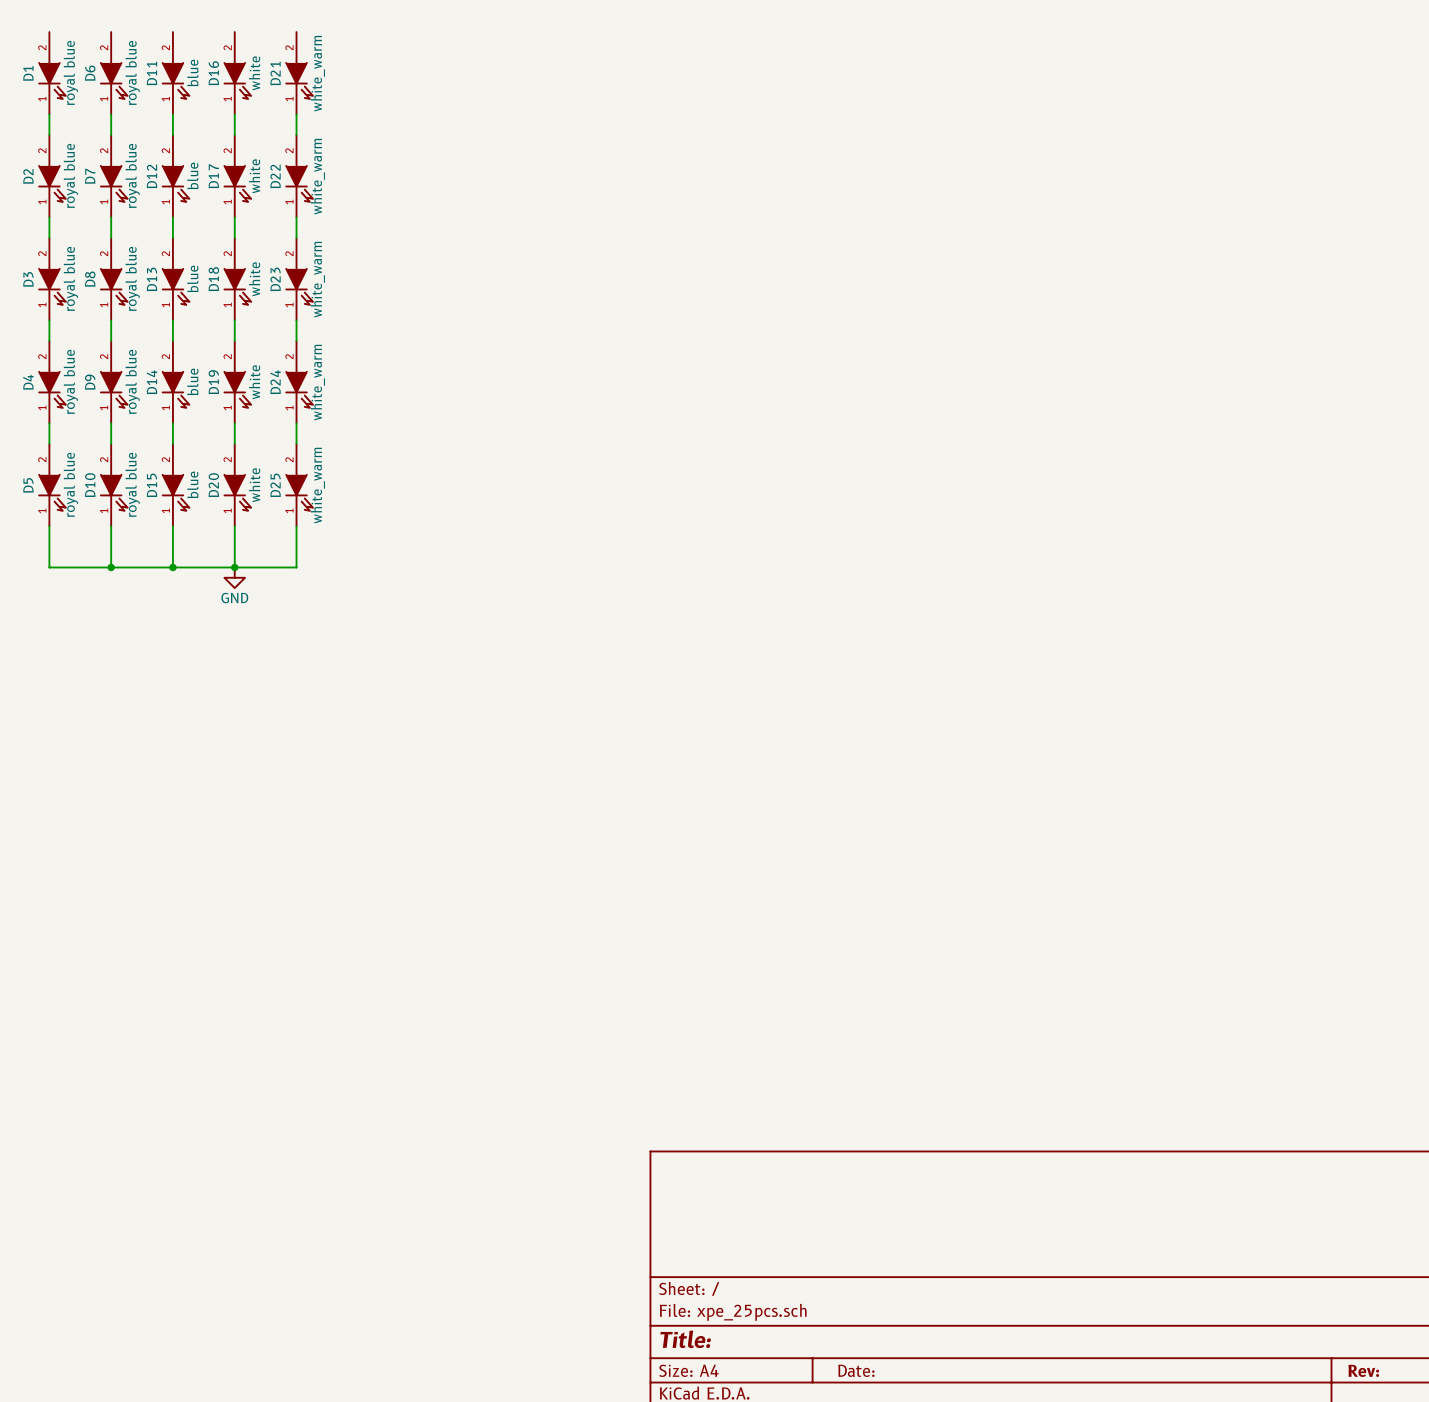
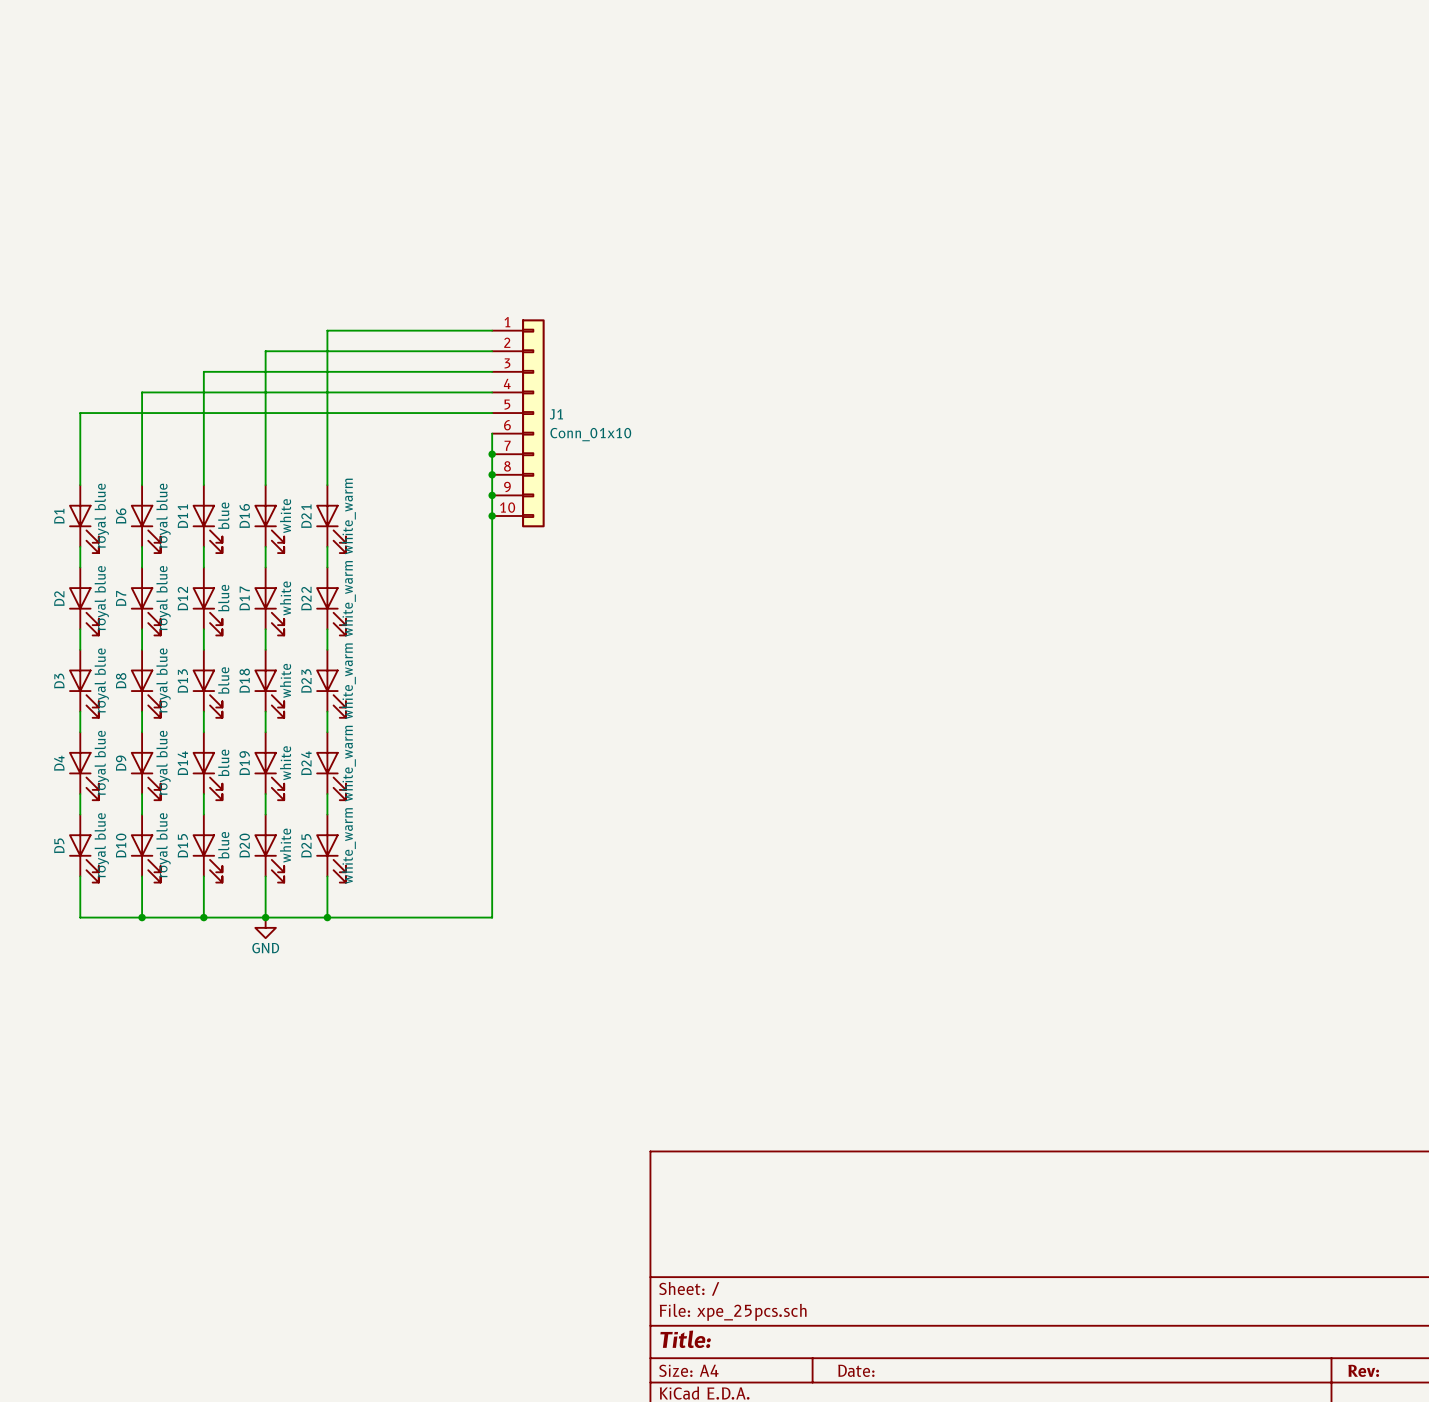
D1 symbol: [39, 32, 66, 115] -> [69, 485, 99, 554]
D6 symbol: [100, 32, 128, 115] -> [130, 485, 161, 554]
D11 symbol: [162, 32, 190, 115] -> [192, 485, 223, 554]
D16 symbol: [224, 32, 252, 115] -> [254, 485, 285, 554]
D21 symbol: [286, 32, 313, 115] -> [316, 485, 346, 554]
wire: (49, 114) (49, 135) -> none
wire: (111, 114) (111, 135) -> none
wire: (172, 114) (172, 135) -> none
wire: (234, 114) (234, 135) -> none
wire: (296, 114) (296, 135) -> none
D2 symbol: [39, 135, 66, 218] -> [69, 567, 99, 636]
D7 symbol: [100, 135, 128, 218] -> [130, 567, 161, 636]
D12 symbol: [162, 135, 190, 218] -> [192, 567, 223, 636]
D17 symbol: [224, 135, 252, 218] -> [254, 567, 285, 636]
D22 symbol: [286, 135, 313, 218] -> [316, 567, 346, 636]
wire: (49, 217) (49, 237) -> none
wire: (111, 217) (111, 237) -> none
wire: (172, 217) (172, 237) -> none
wire: (234, 217) (234, 237) -> none
wire: (296, 217) (296, 237) -> none
D3 symbol: [39, 237, 66, 321] -> [69, 649, 99, 718]
D8 symbol: [100, 237, 128, 321] -> [130, 649, 161, 718]
D13 symbol: [162, 237, 190, 321] -> [192, 649, 223, 718]
D18 symbol: [224, 237, 252, 321] -> [254, 649, 285, 718]
D23 symbol: [286, 237, 313, 321] -> [316, 649, 346, 718]
wire: (49, 320) (49, 340) -> none
wire: (111, 320) (111, 340) -> none
wire: (172, 320) (172, 340) -> none
wire: (234, 320) (234, 340) -> none
wire: (296, 320) (296, 340) -> none
wire: none -> (492, 330) (327, 330) (327, 485)
D4 symbol: [39, 340, 66, 424] -> [69, 732, 99, 801]
D9 symbol: [100, 340, 128, 424] -> [130, 732, 161, 801]
D14 symbol: [162, 340, 190, 424] -> [192, 732, 223, 801]
D19 symbol: [224, 340, 252, 424] -> [254, 732, 285, 801]
D24 symbol: [286, 340, 313, 424] -> [316, 732, 346, 801]
wire: none -> (492, 351) (265, 351) (265, 485)
wire: none -> (492, 371) (203, 371) (203, 485)
wire: none -> (492, 392) (142, 392) (142, 485)
wire: none -> (492, 413) (80, 413) (80, 485)
wire: (49, 423) (49, 443) -> (80, 546) (80, 567)
wire: (111, 423) (111, 443) -> (142, 546) (142, 567)
wire: (172, 423) (172, 443) -> (203, 546) (203, 567)
wire: (234, 423) (234, 443) -> (265, 546) (265, 567)
wire: (296, 423) (296, 443) -> (327, 546) (327, 567)
J1: none -> Conn_01x10 (518, 423)
wire: none -> (492, 433) (492, 917) (80, 917) (80, 876)
D5 symbol: [39, 443, 66, 527] -> [69, 814, 99, 883]
D10 symbol: [100, 443, 128, 527] -> [130, 814, 161, 883]
D15 symbol: [162, 443, 190, 527] -> [192, 814, 223, 883]
D20 symbol: [224, 443, 252, 527] -> [254, 814, 285, 883]
D25 symbol: [286, 443, 313, 527] -> [316, 814, 346, 883]
junction: none -> (492, 454)
junction: none -> (492, 474)
junction: none -> (492, 495)
junction: none -> (492, 516)
wire: (49, 526) (49, 567) (296, 567) (296, 526) -> none
wire: (111, 526) (111, 567) -> none
wire: (172, 526) (172, 567) -> none
wire: (234, 526) (234, 567) -> none
junction: (111, 567) -> none
junction: (172, 567) -> none
junction: (234, 567) -> none
power symbol: GND (234, 577) -> none
wire: none -> (80, 629) (80, 649)
wire: none -> (142, 629) (142, 649)
wire: none -> (203, 629) (203, 649)
wire: none -> (265, 629) (265, 649)
wire: none -> (327, 629) (327, 649)
wire: none -> (80, 711) (80, 732)
wire: none -> (142, 711) (142, 732)
wire: none -> (203, 711) (203, 732)
wire: none -> (265, 711) (265, 732)
wire: none -> (327, 711) (327, 732)
wire: none -> (80, 794) (80, 814)
wire: none -> (142, 794) (142, 814)
wire: none -> (203, 794) (203, 814)
wire: none -> (265, 794) (265, 814)
wire: none -> (327, 794) (327, 814)
wire: none -> (142, 876) (142, 917)
wire: none -> (203, 876) (203, 917)
wire: none -> (265, 876) (265, 917)
wire: none -> (327, 876) (327, 917)
junction: none -> (142, 917)
junction: none -> (203, 917)
junction: none -> (265, 917)
junction: none -> (327, 917)
power symbol: none -> GND (265, 927)

